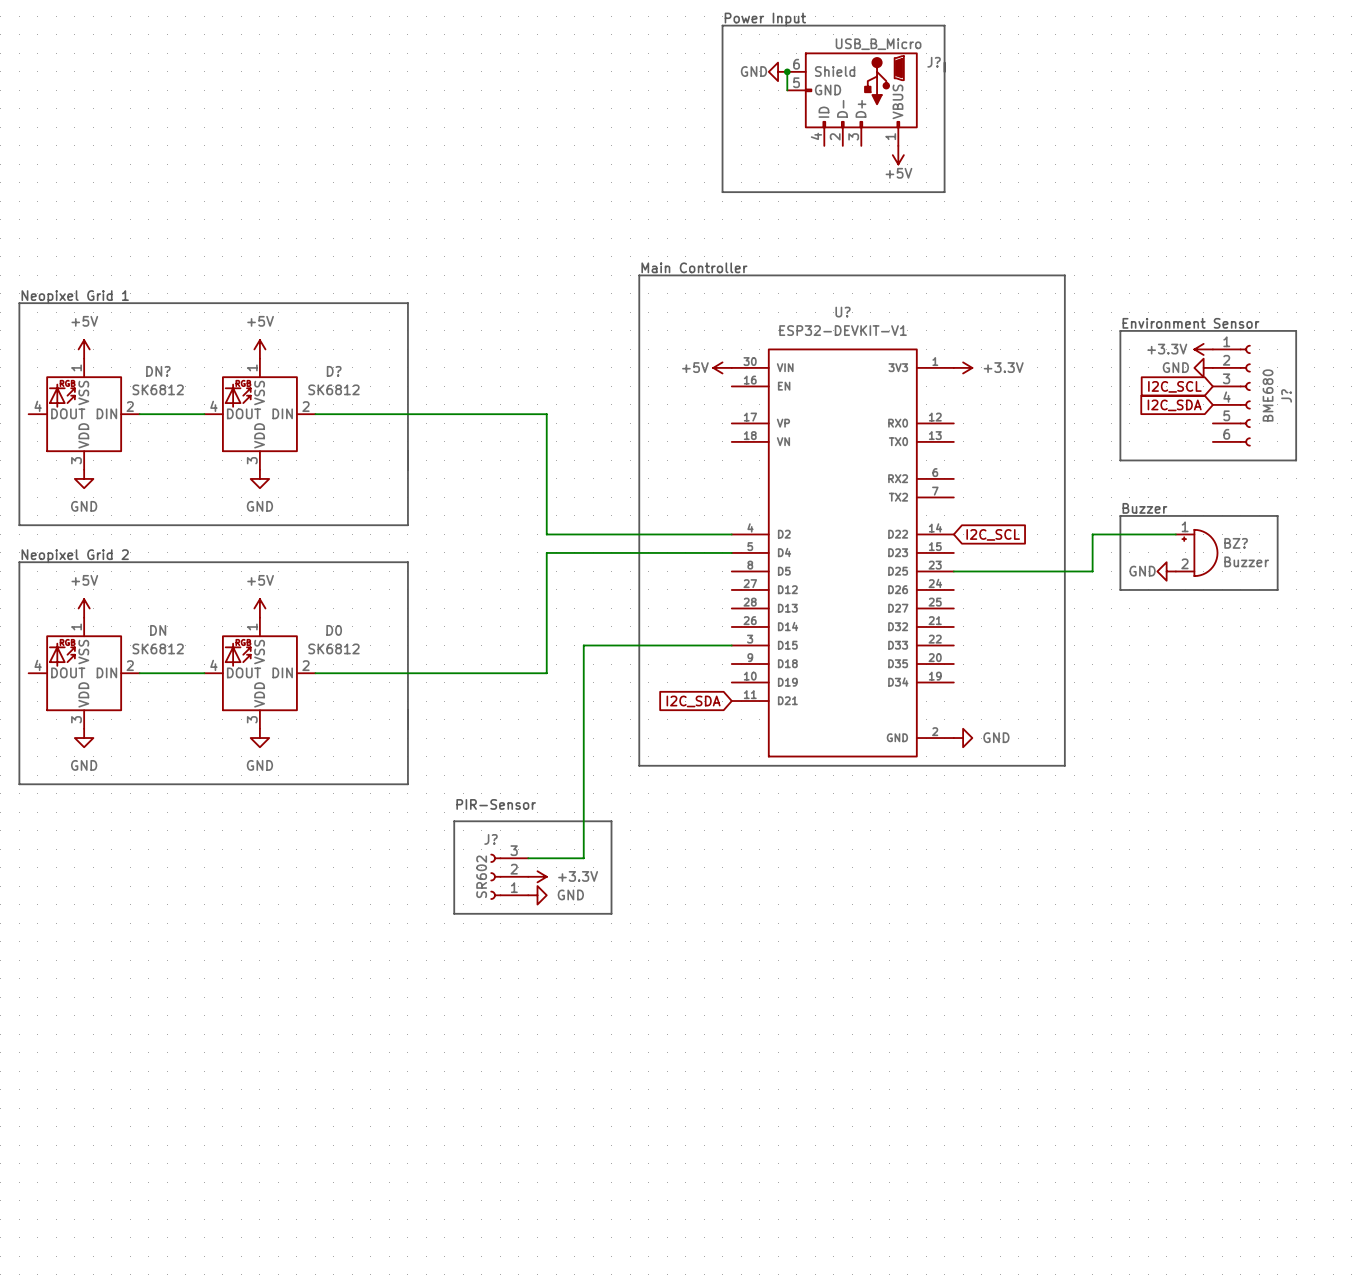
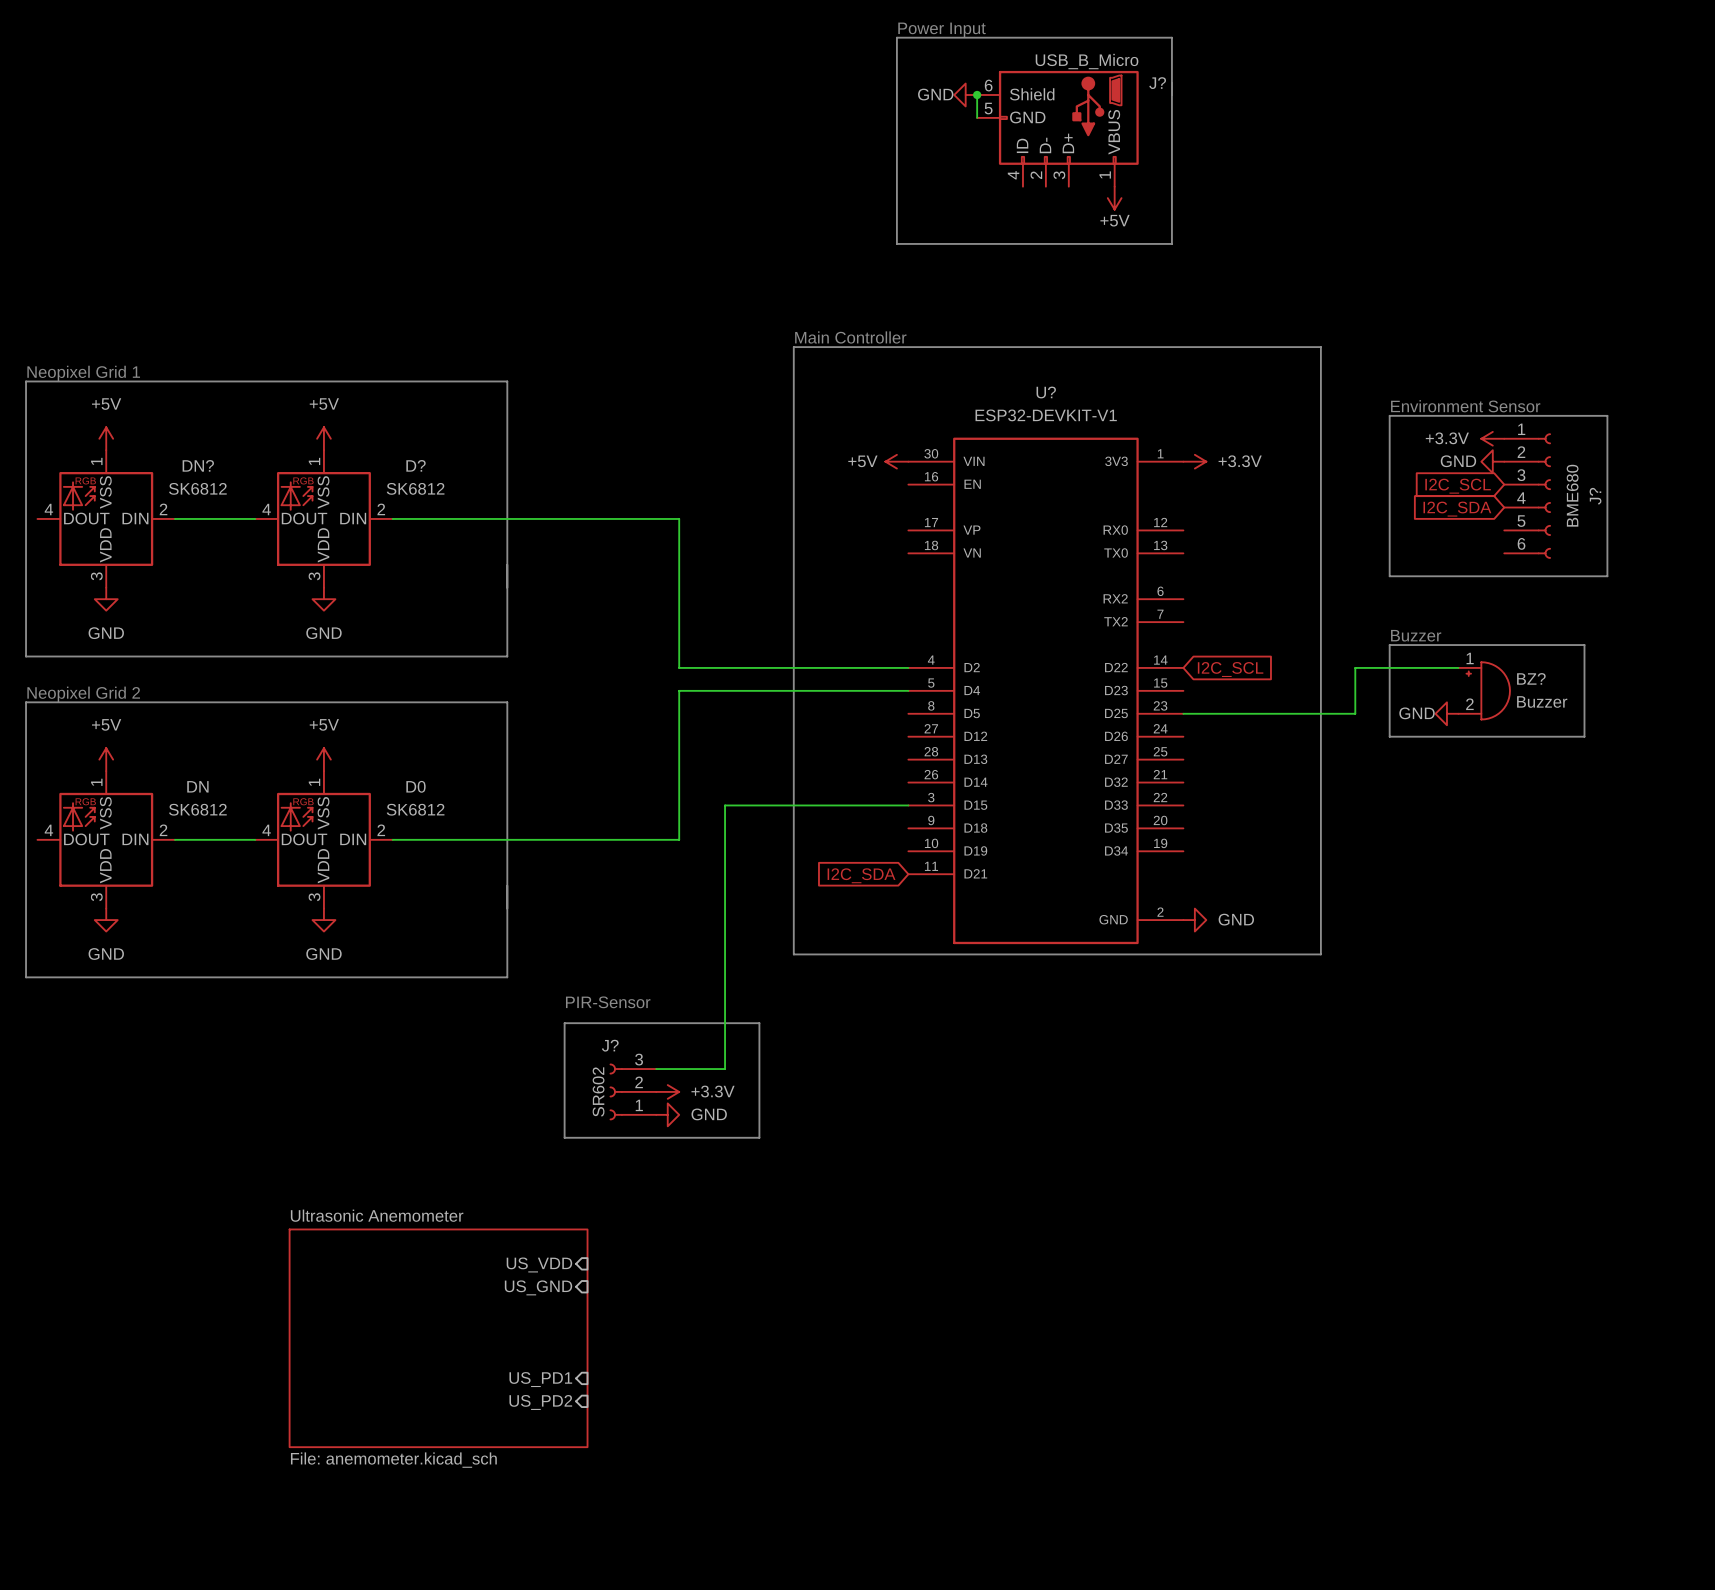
sheet pin: none -> US_VDD (539, 1264)
sheet pin: none -> US_GND (538, 1287)
sheet Ultrasonic Anemometer: none -> File: anemometer.kicad_sch (438, 1338)
sheet pin: none -> US_PD1 (540, 1379)
sheet pin: none -> US_PD2 (540, 1402)

